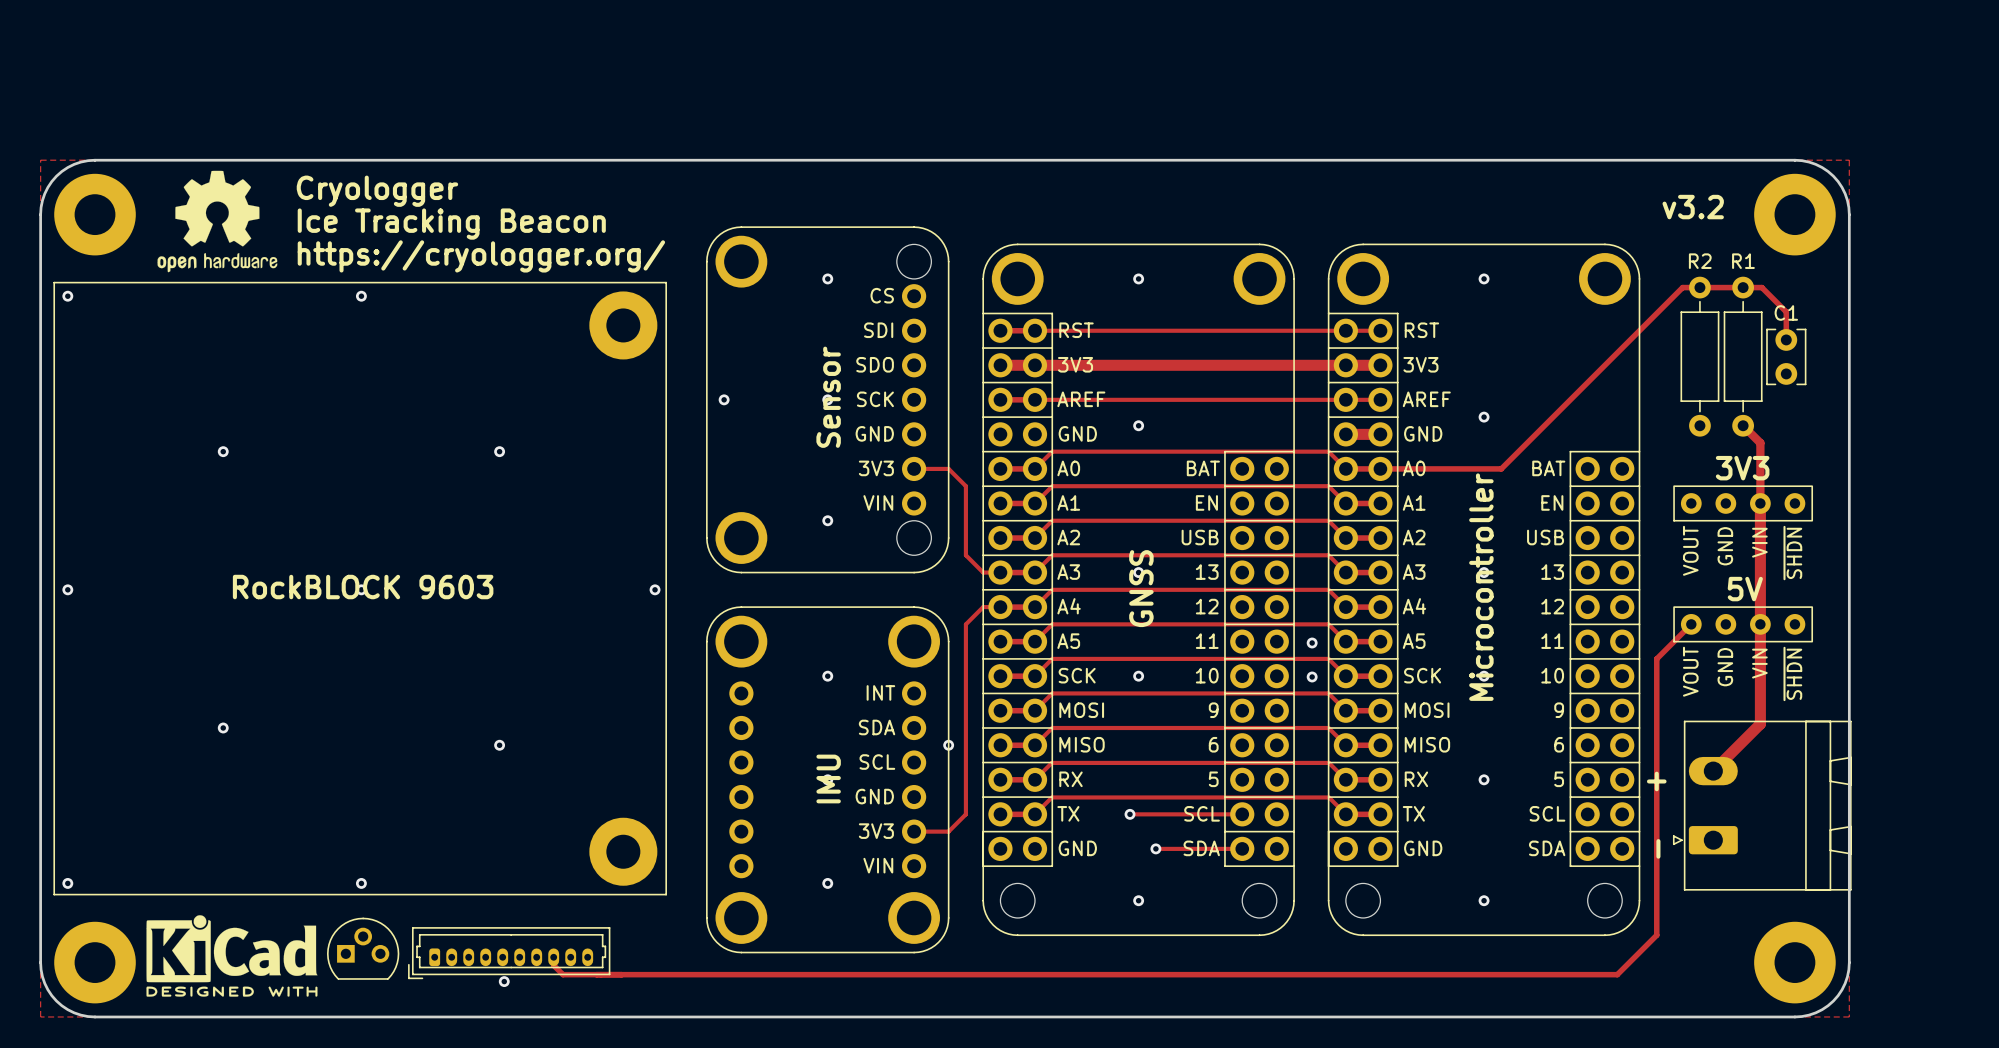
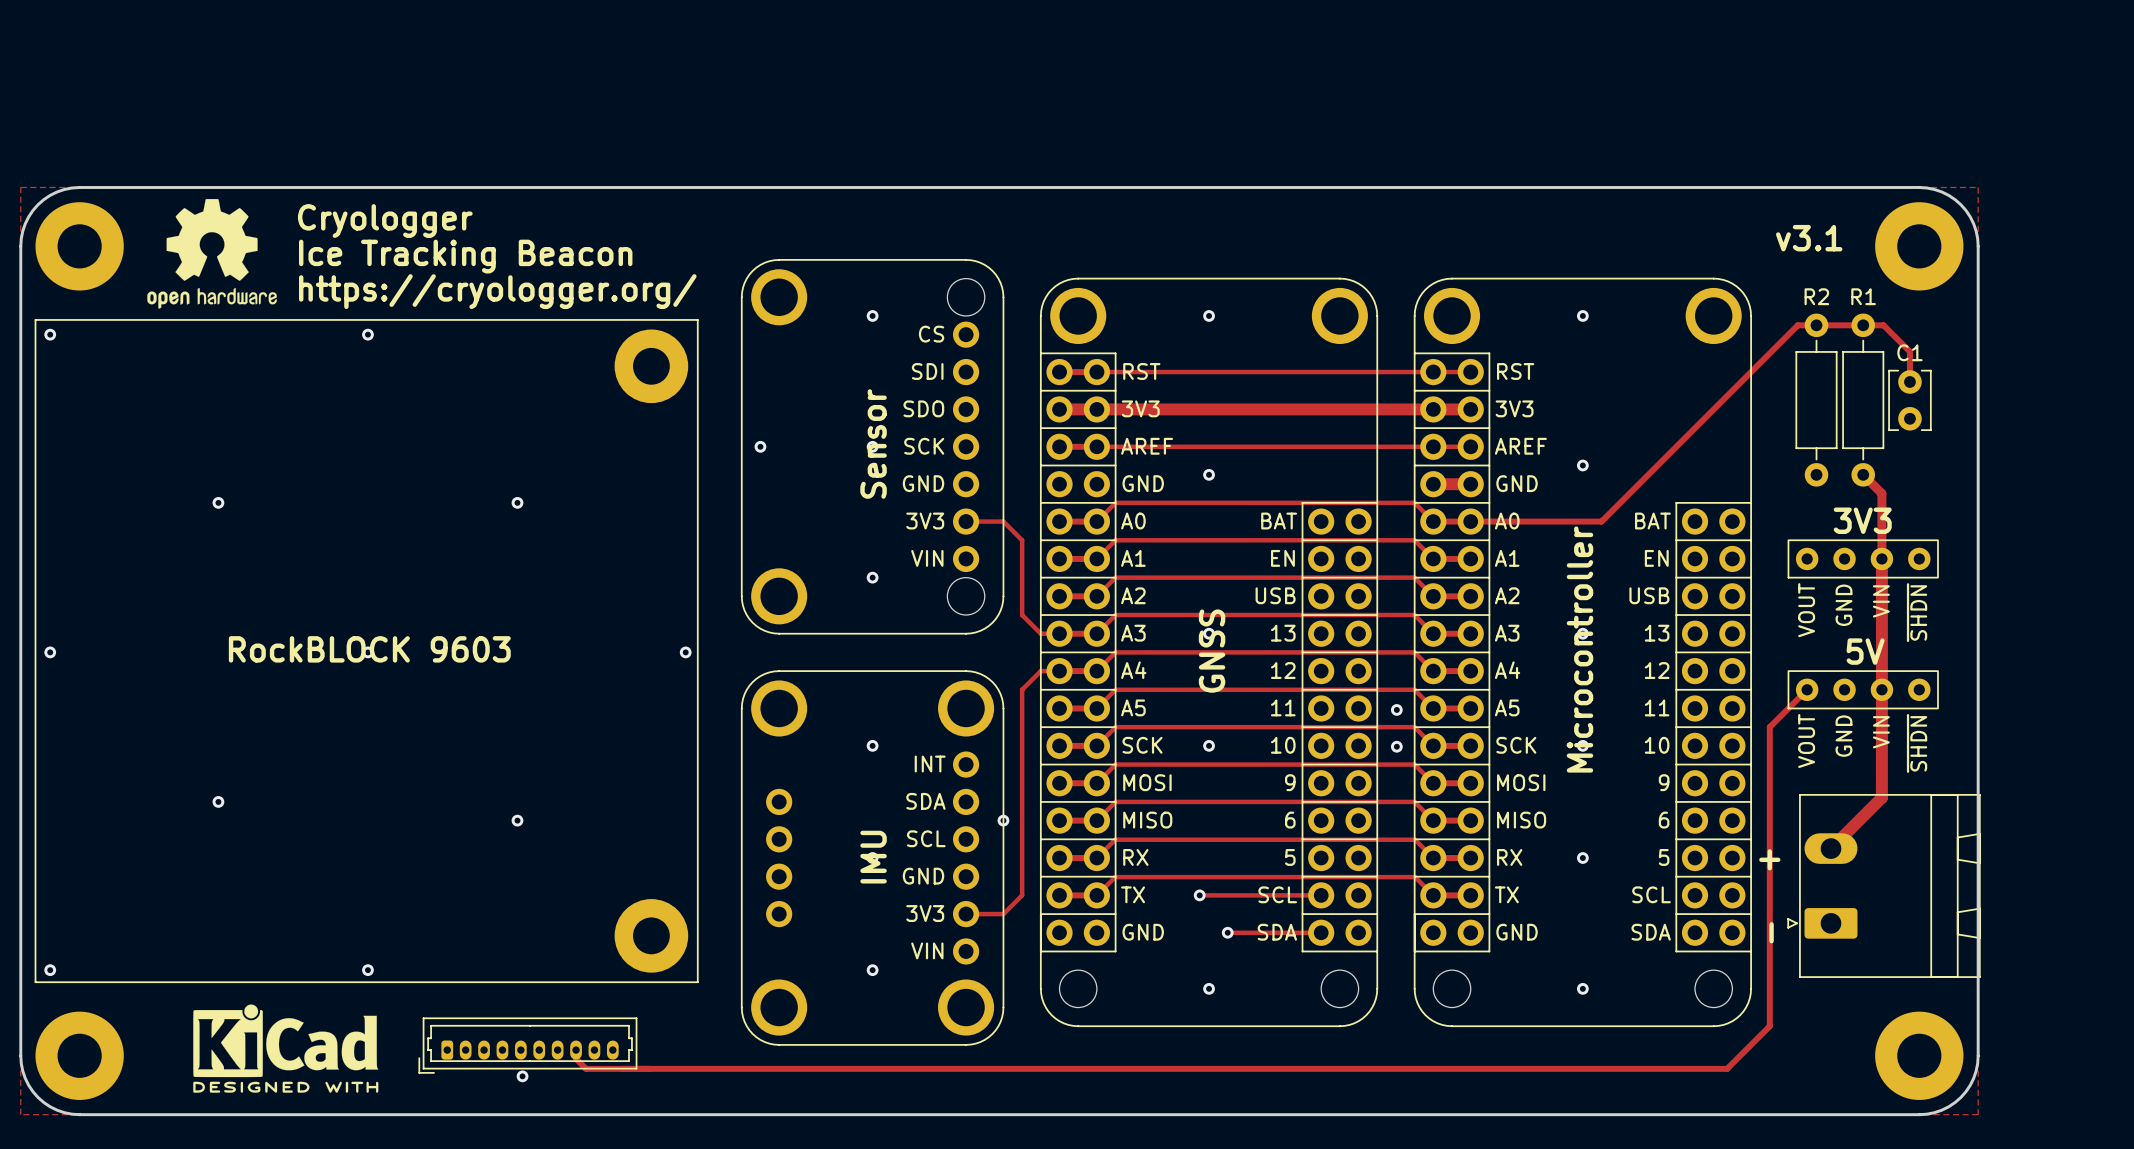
text: v3.2 (1693, 207) -> v3.1 (1809, 238)
part footprint: [706, 606, 950, 954] -> [740, 670, 1005, 1046]
part: (363, 948) -> none
drawing position: (231, 955) -> (285, 1048)

